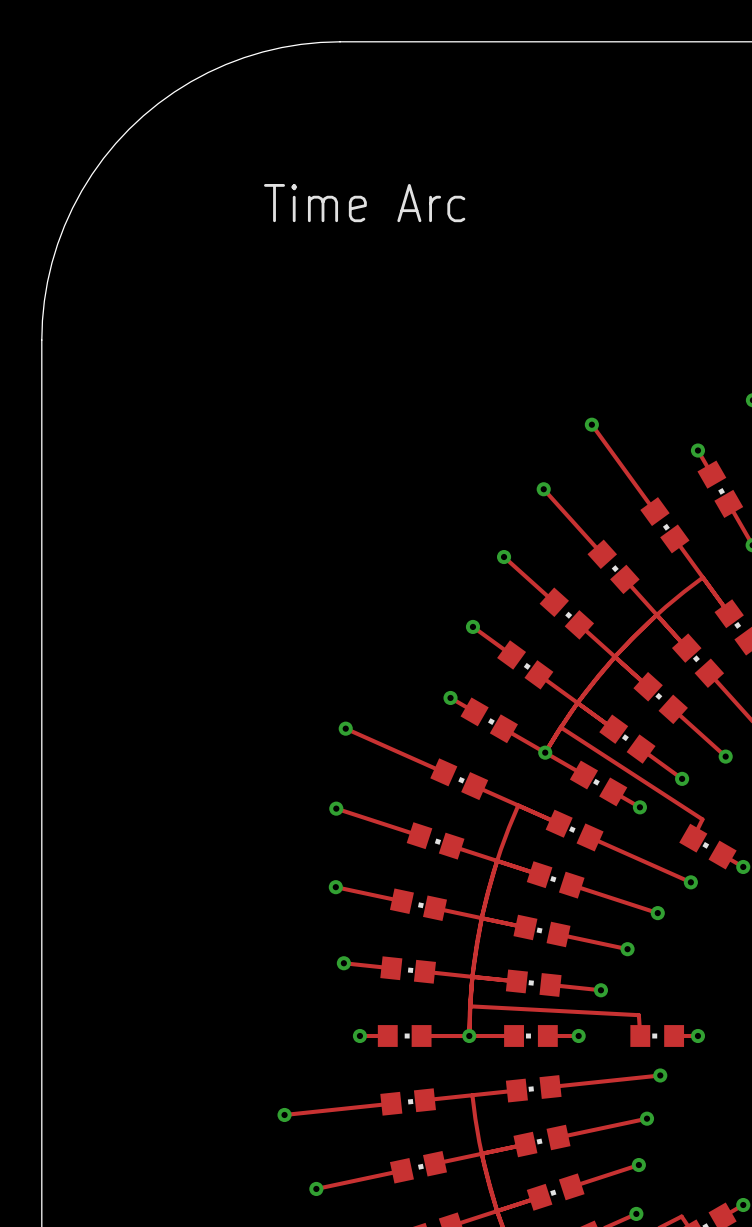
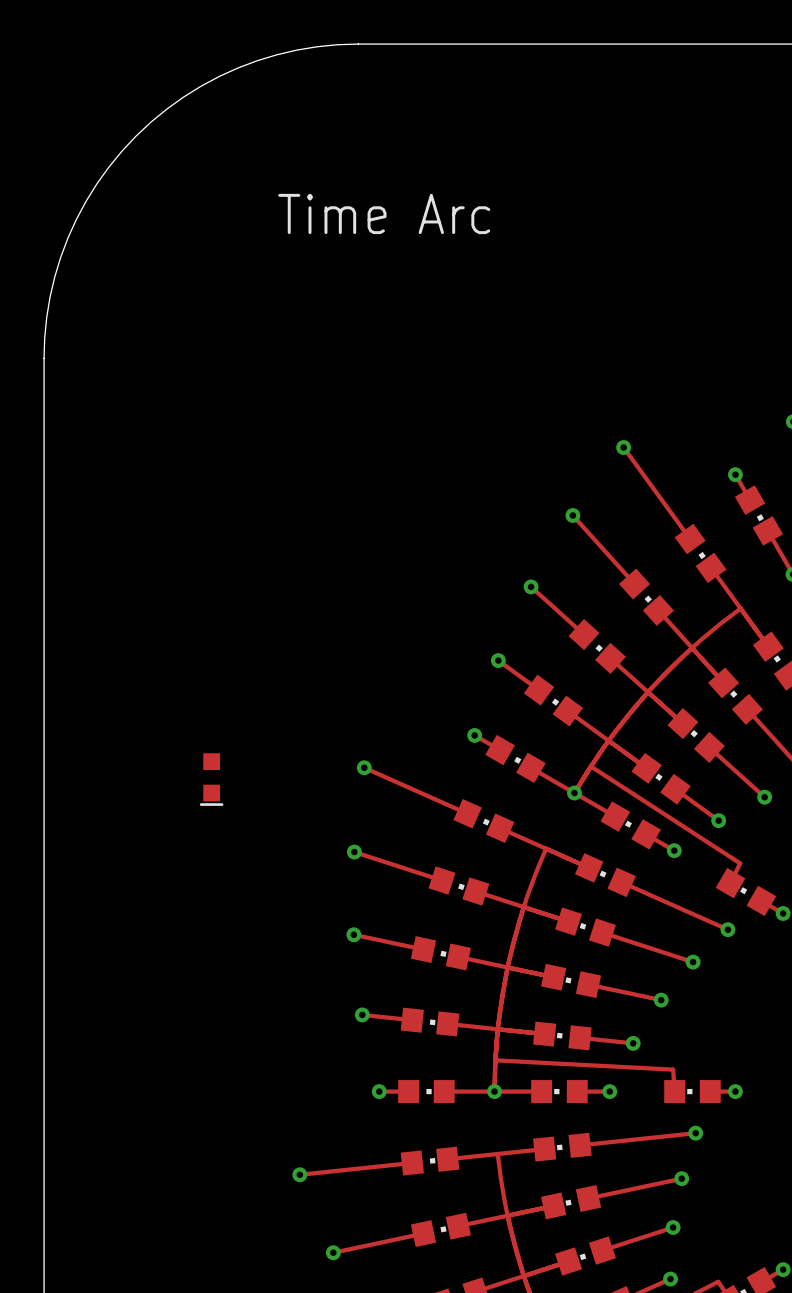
part: none -> (211, 779)

